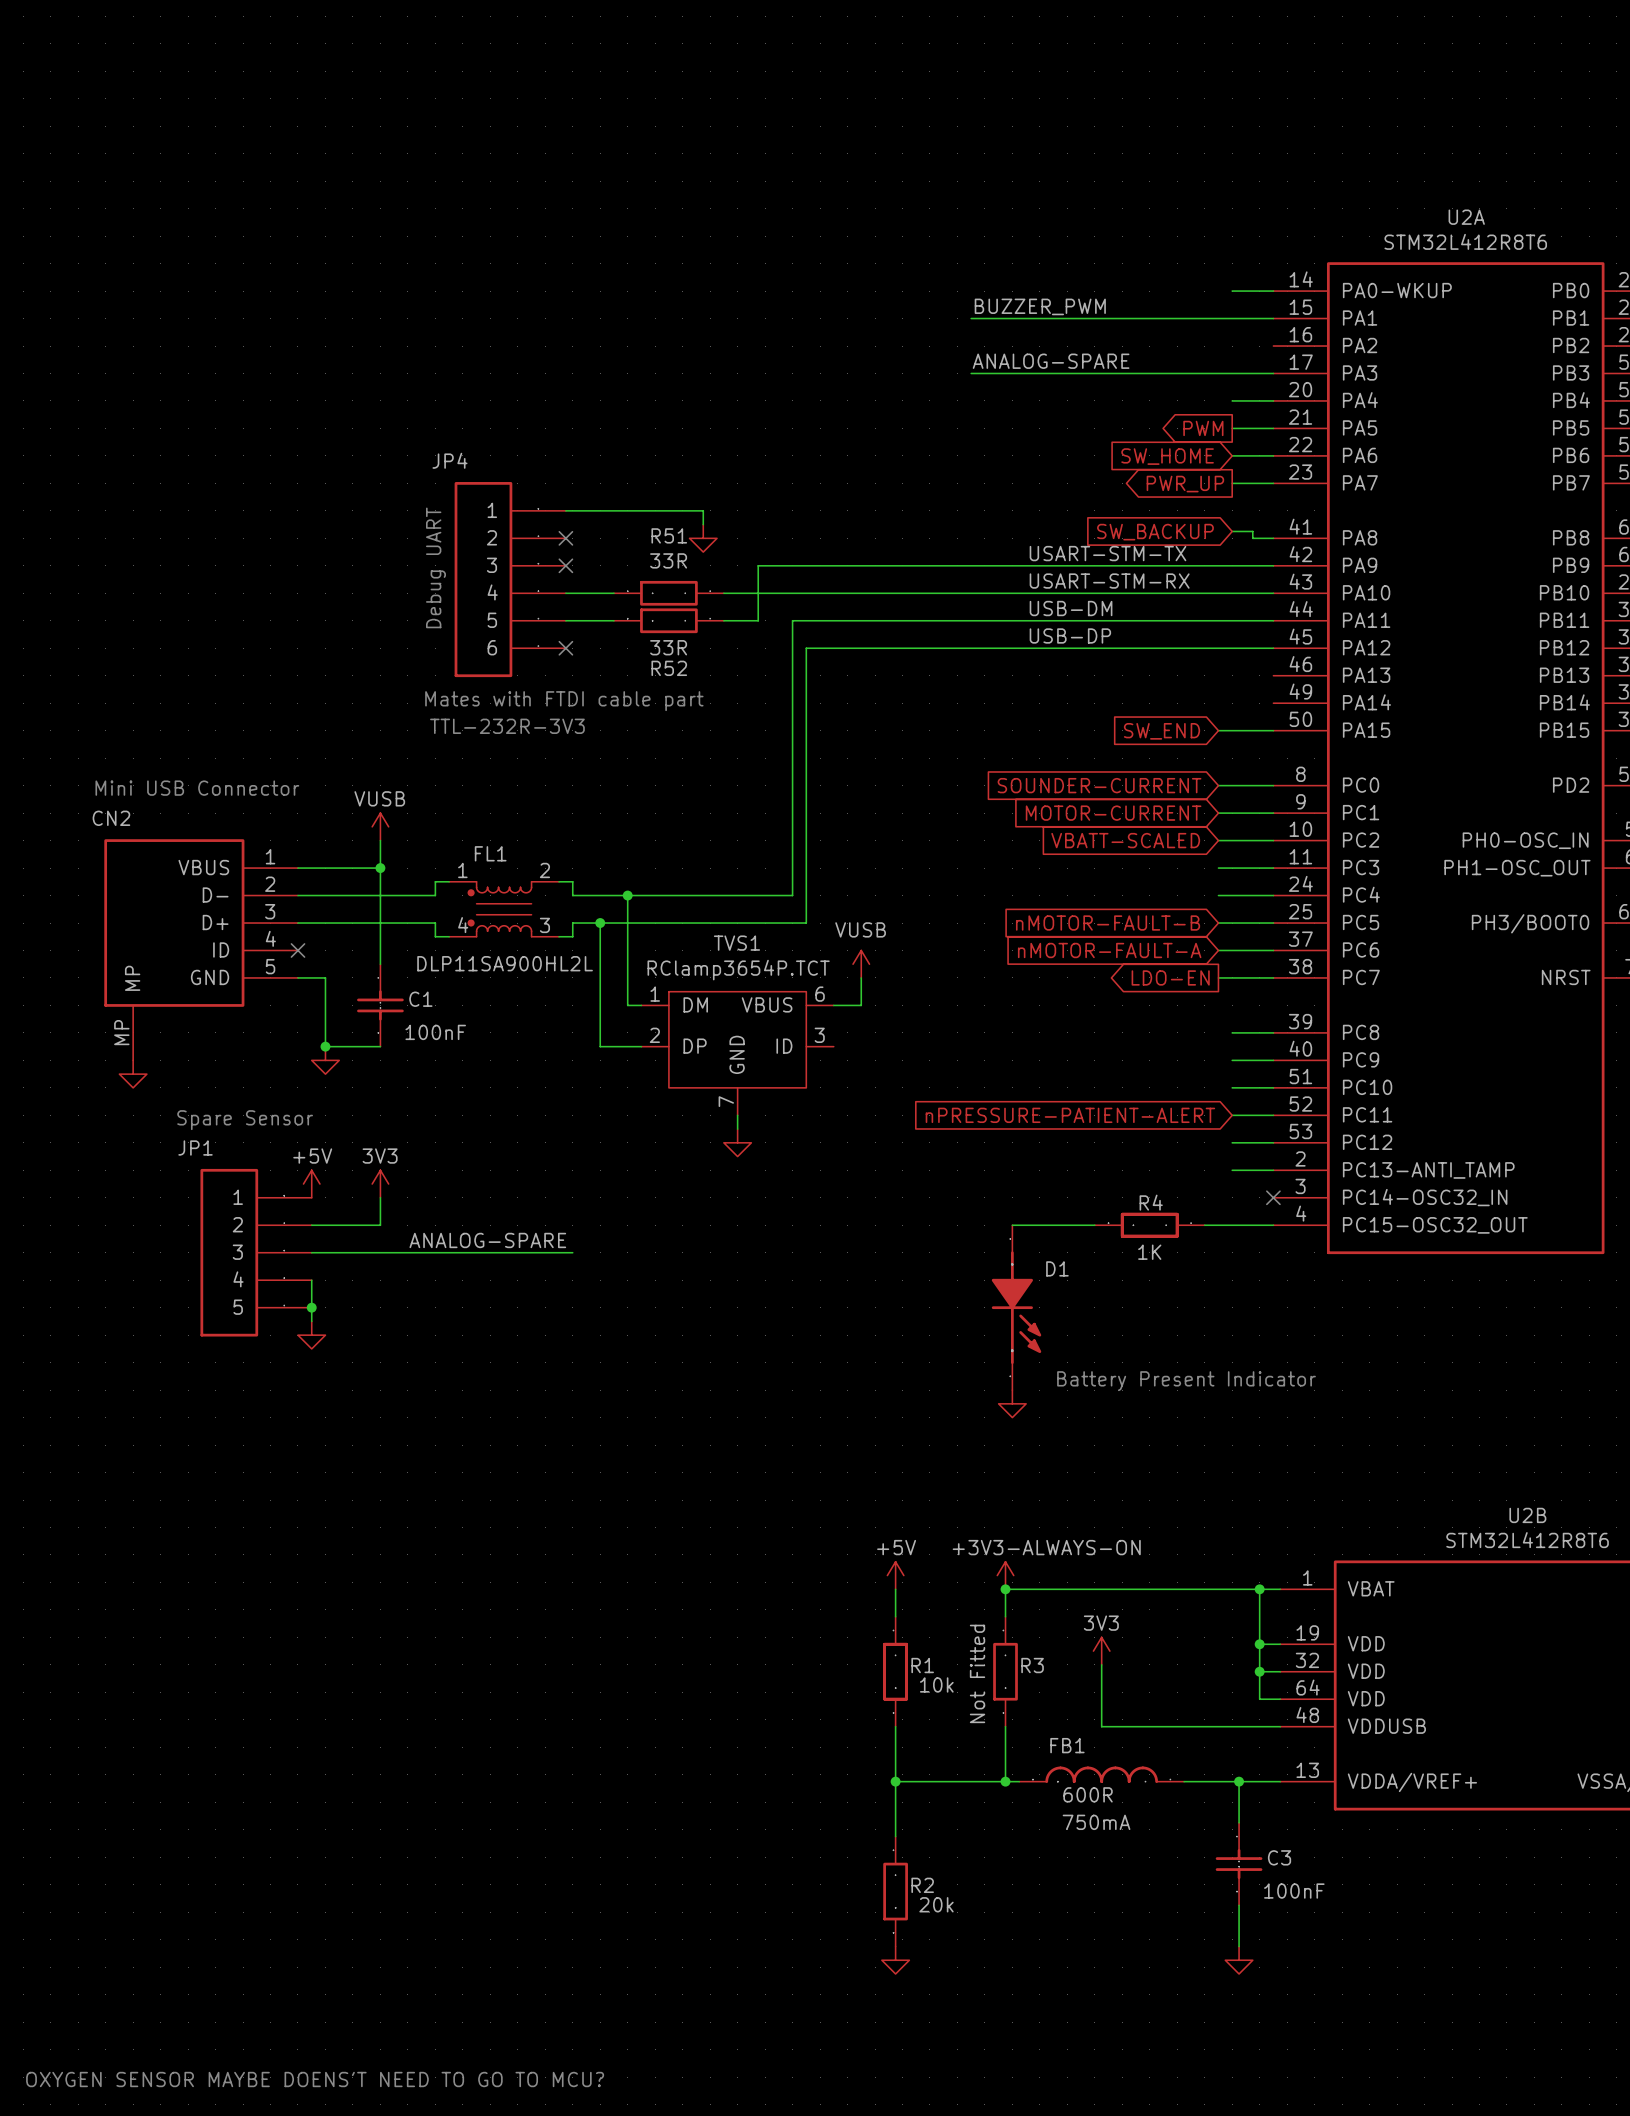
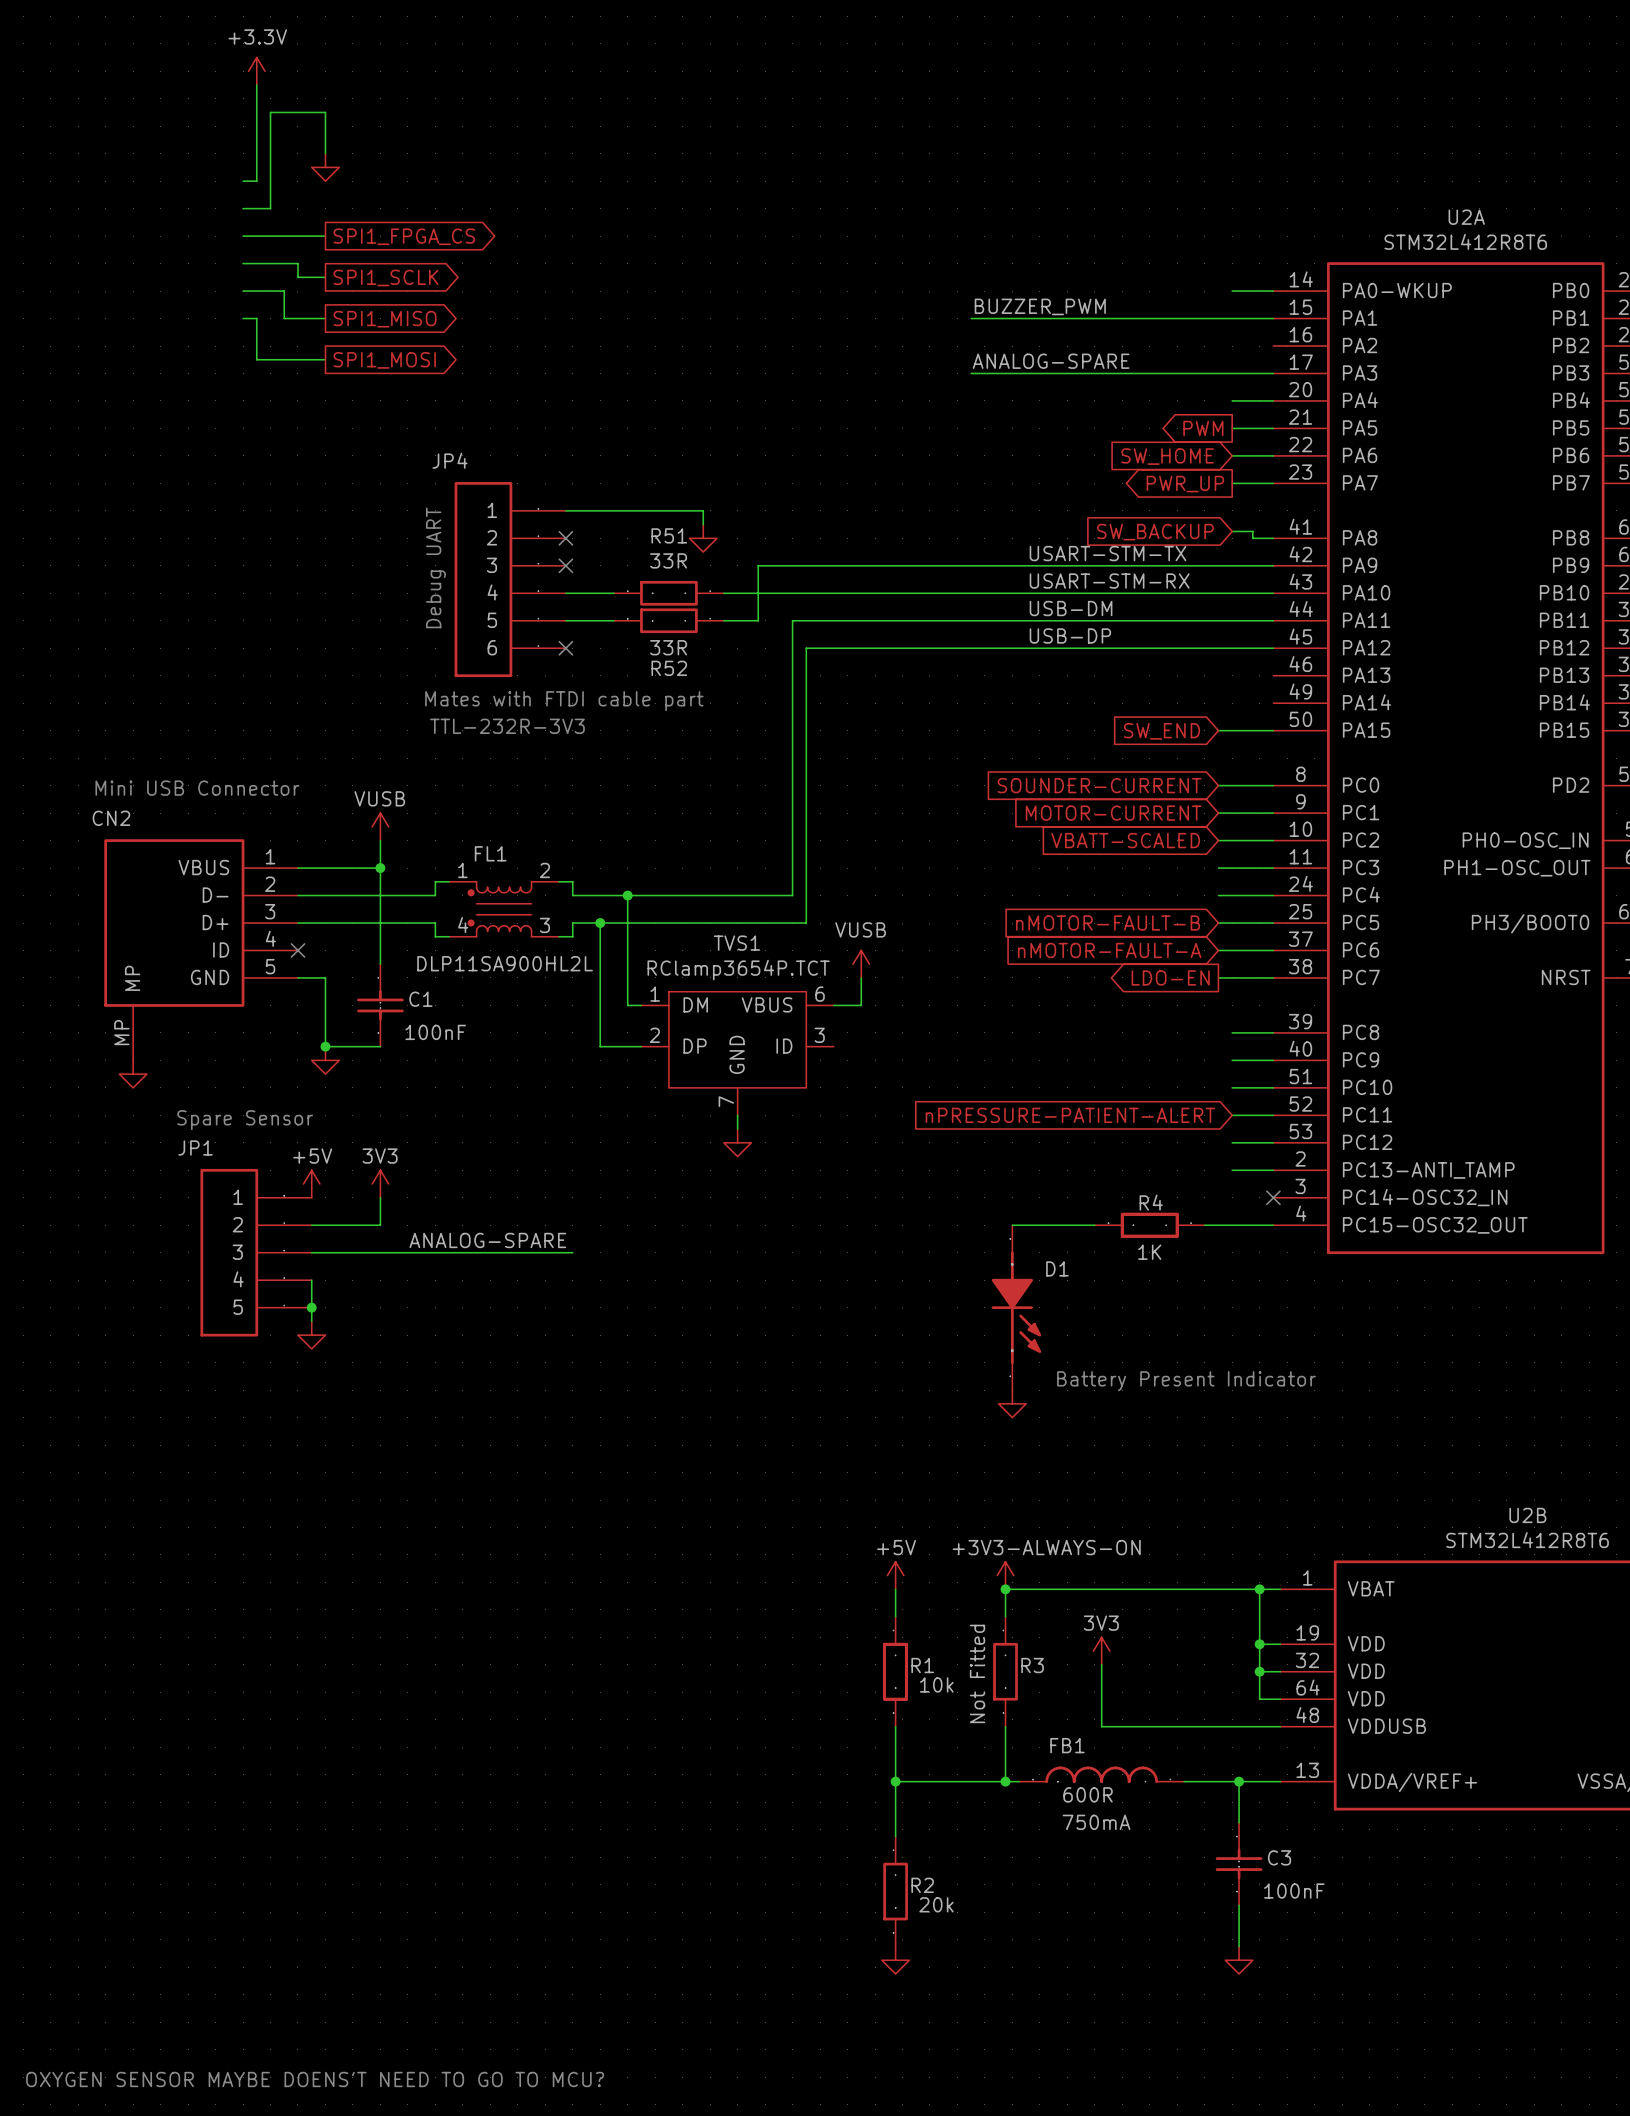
power symbol: none -> +3.3V (256, 71)
wire: none -> (256, 84) (256, 181) (243, 181)
wire: none -> (325, 153) (325, 112) (270, 112) (270, 208) (243, 208)
power symbol: none -> (325, 167)
wire: none -> (243, 236) (325, 236)
global label: none -> SPI1_FPGA_CS (404, 236)
wire: none -> (243, 263) (297, 263) (297, 277) (325, 277)
global label: none -> SPI1_SCLK (386, 277)
wire: none -> (243, 291) (284, 291) (284, 318) (325, 318)
wire: none -> (243, 318) (256, 318) (256, 359) (325, 359)
global label: none -> SPI1_MISO (385, 319)
global label: none -> SPI1_MOSI (384, 360)

